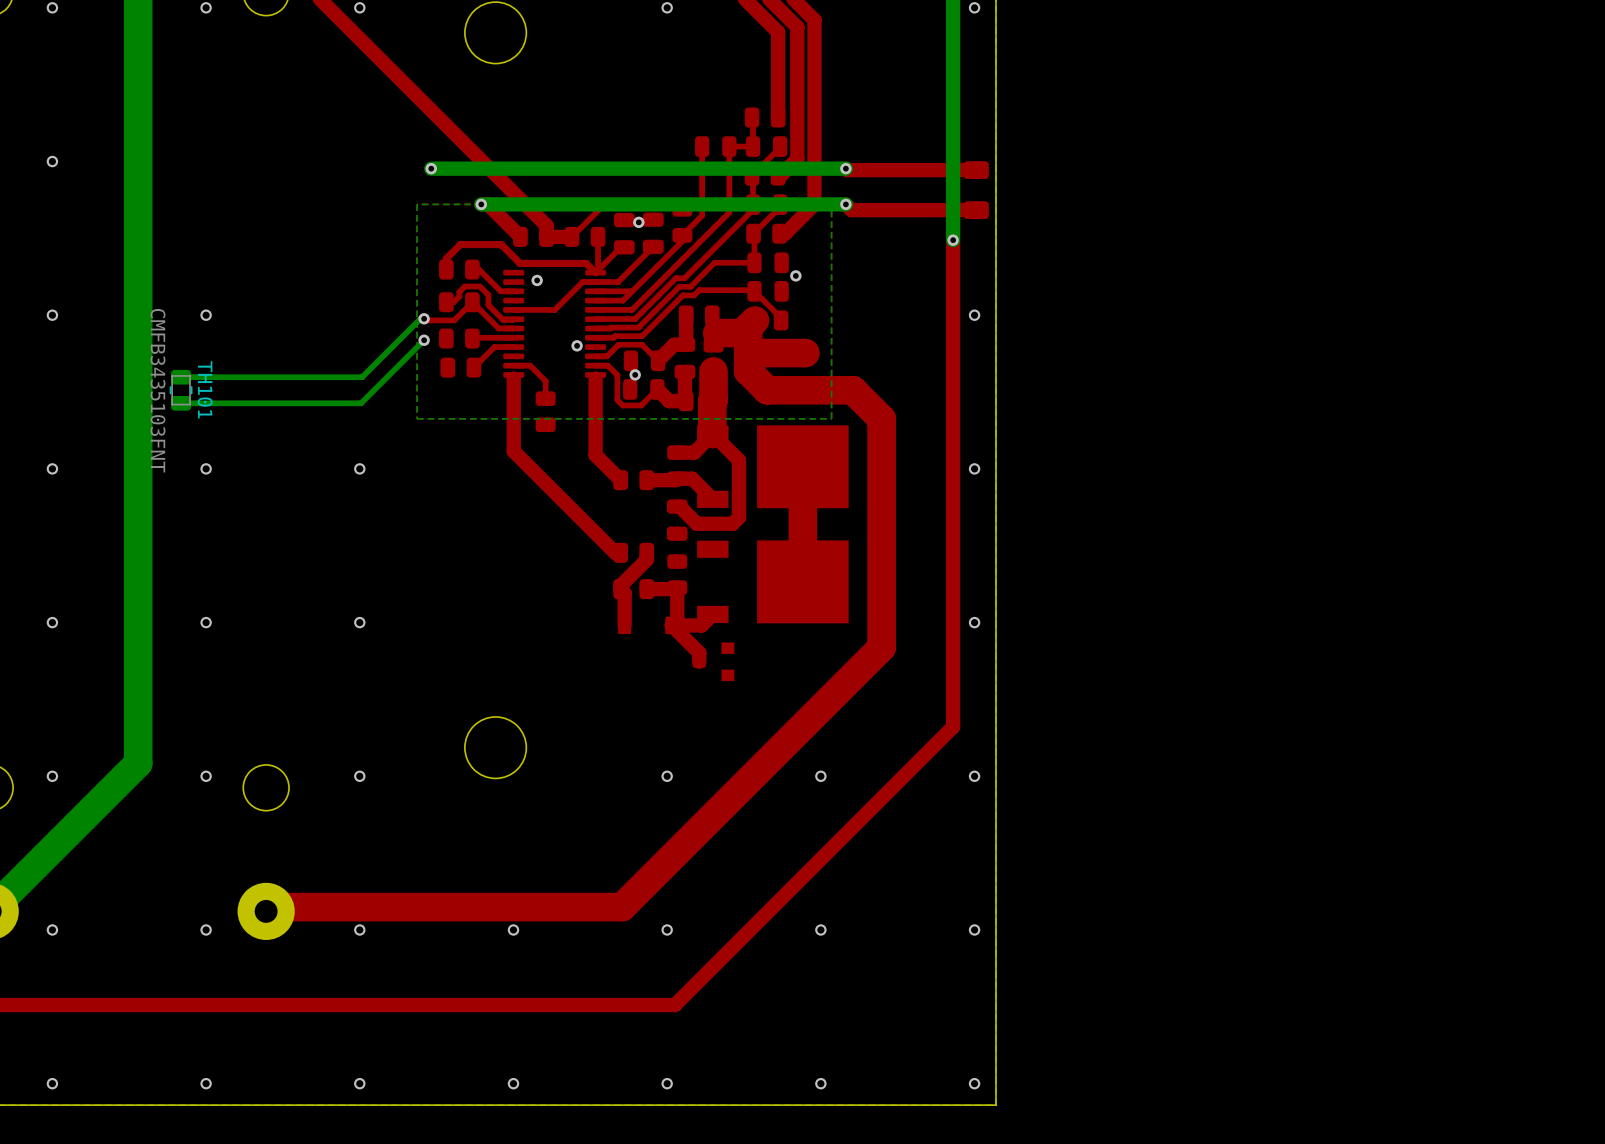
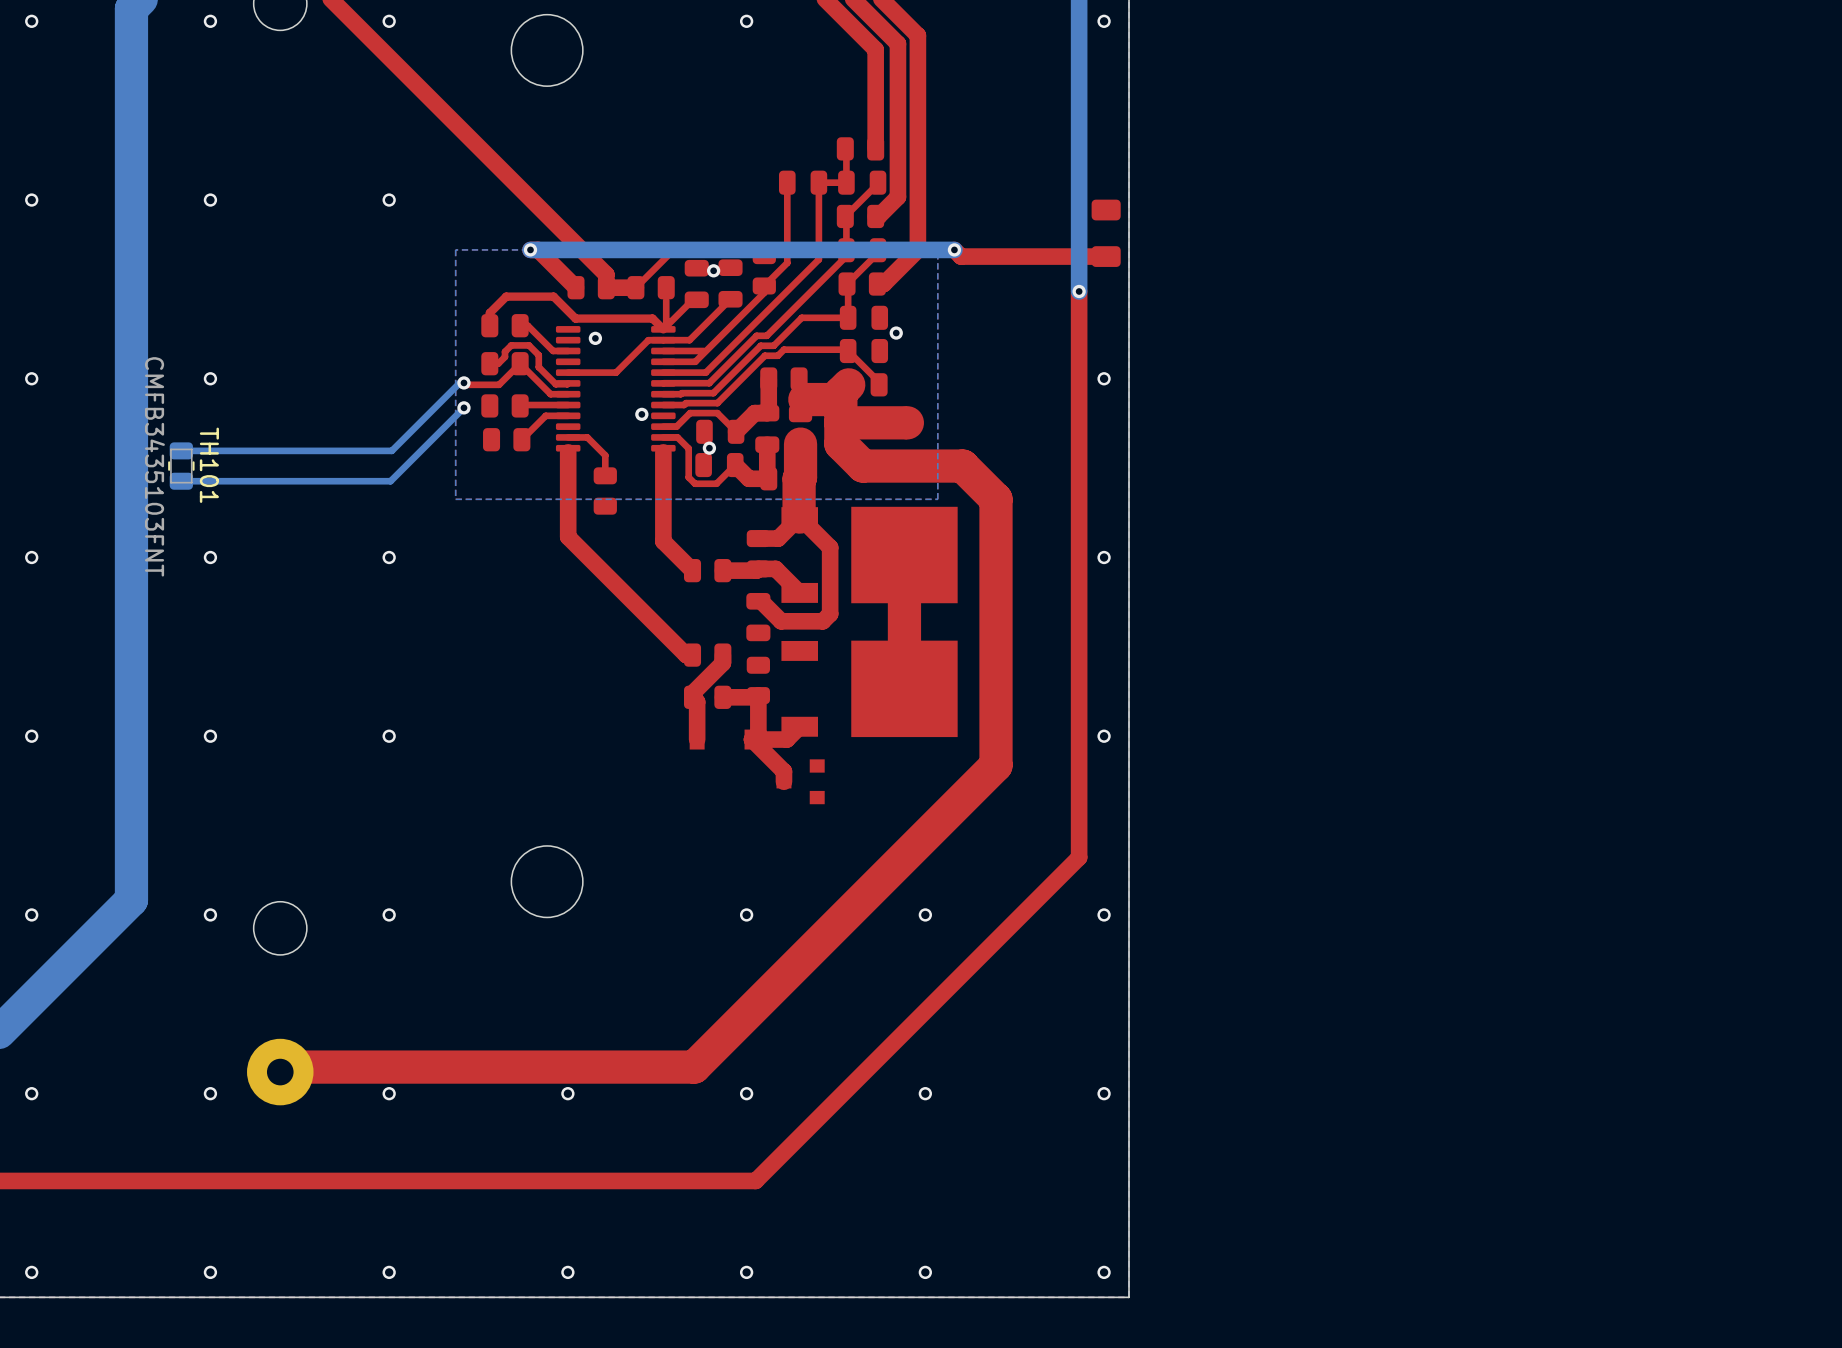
via: none -> (210, 200)
via: none -> (389, 200)
via: (431, 168) -> none
top track: (845, 168) (976, 170) -> none
bottom track: (845, 168) (431, 168) -> none
via: (845, 168) -> none

